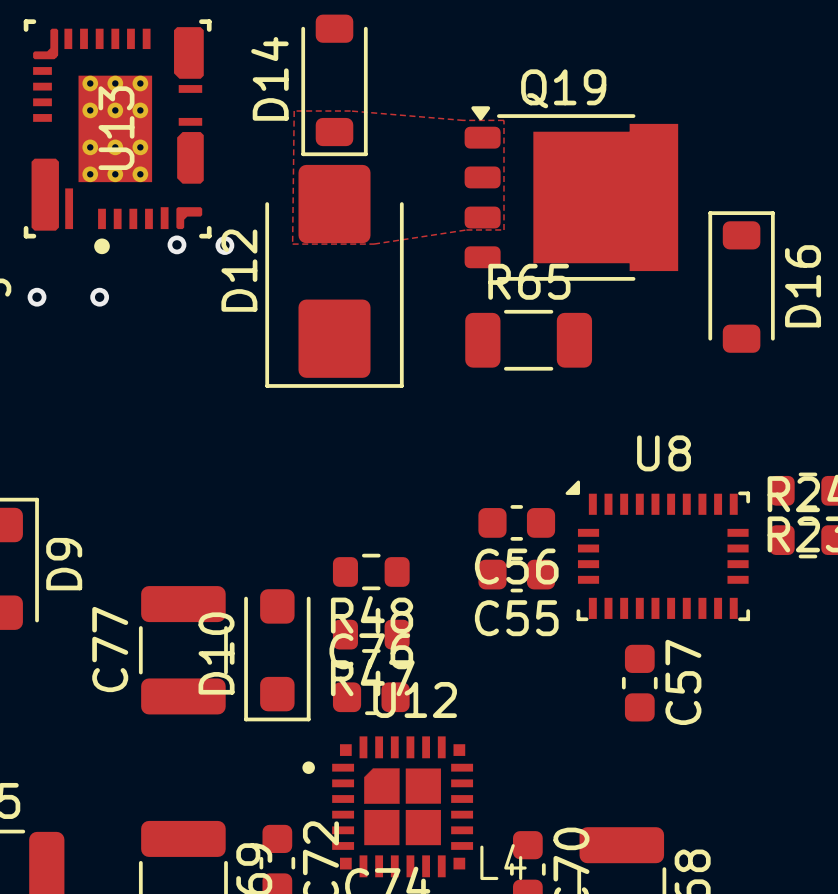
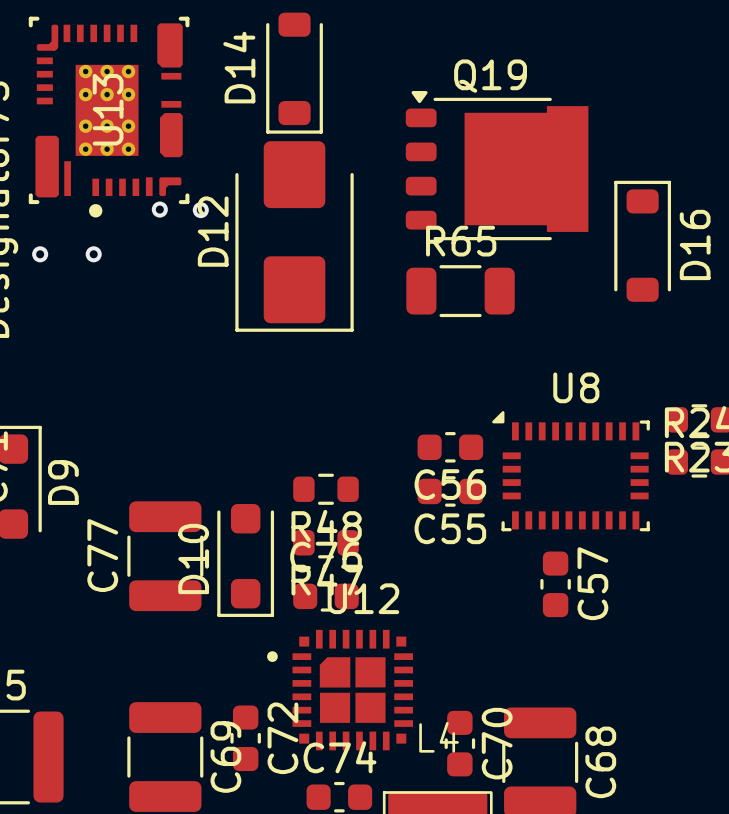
zone outline: (294, 111) (350, 111) (463, 120) (503, 120) (503, 229) (466, 229) (374, 244) (292, 244) (294, 111) -> none

